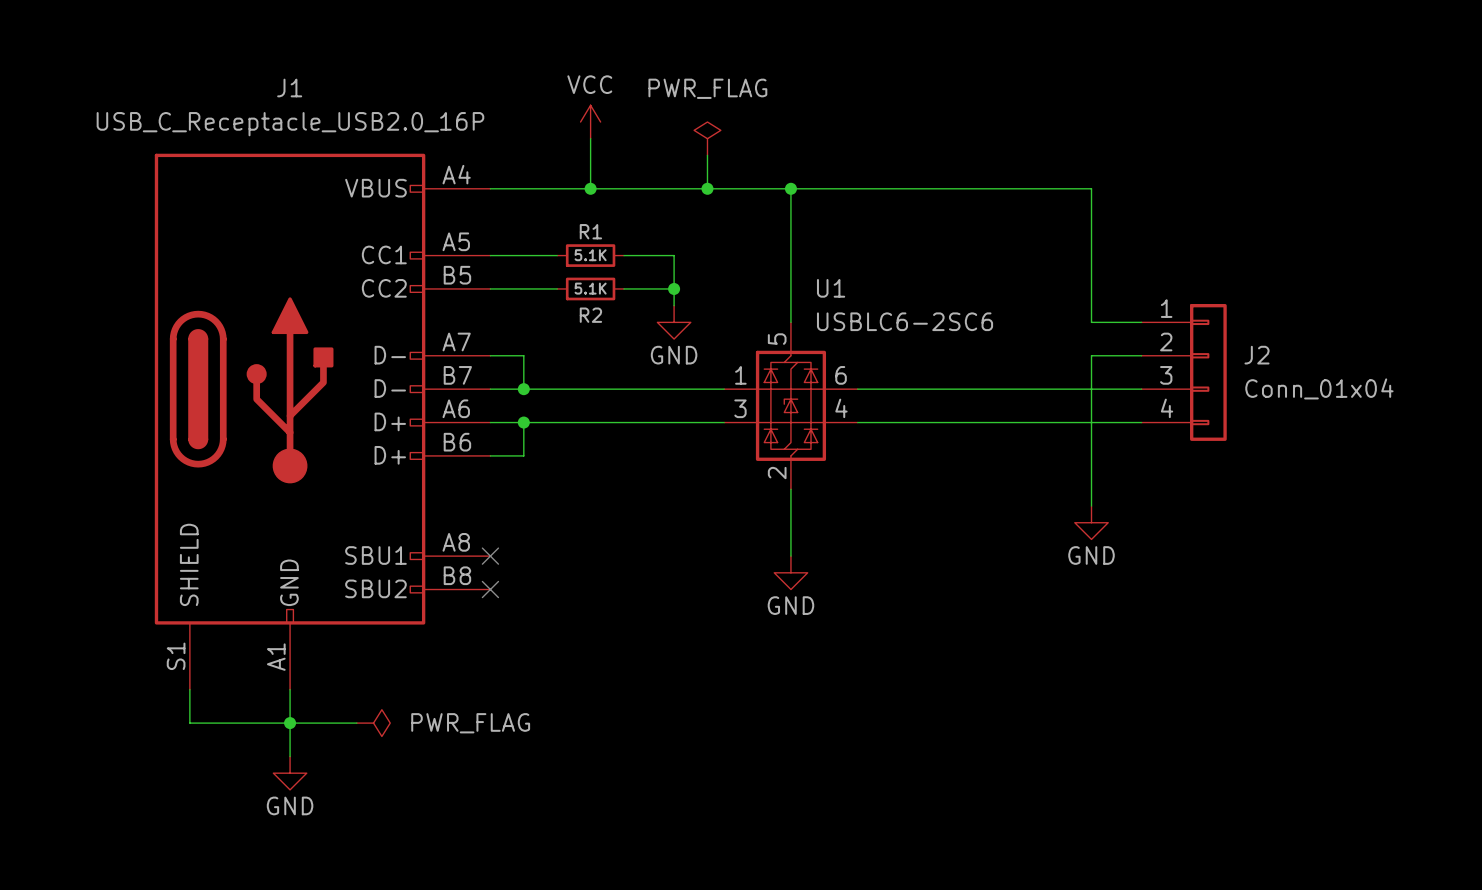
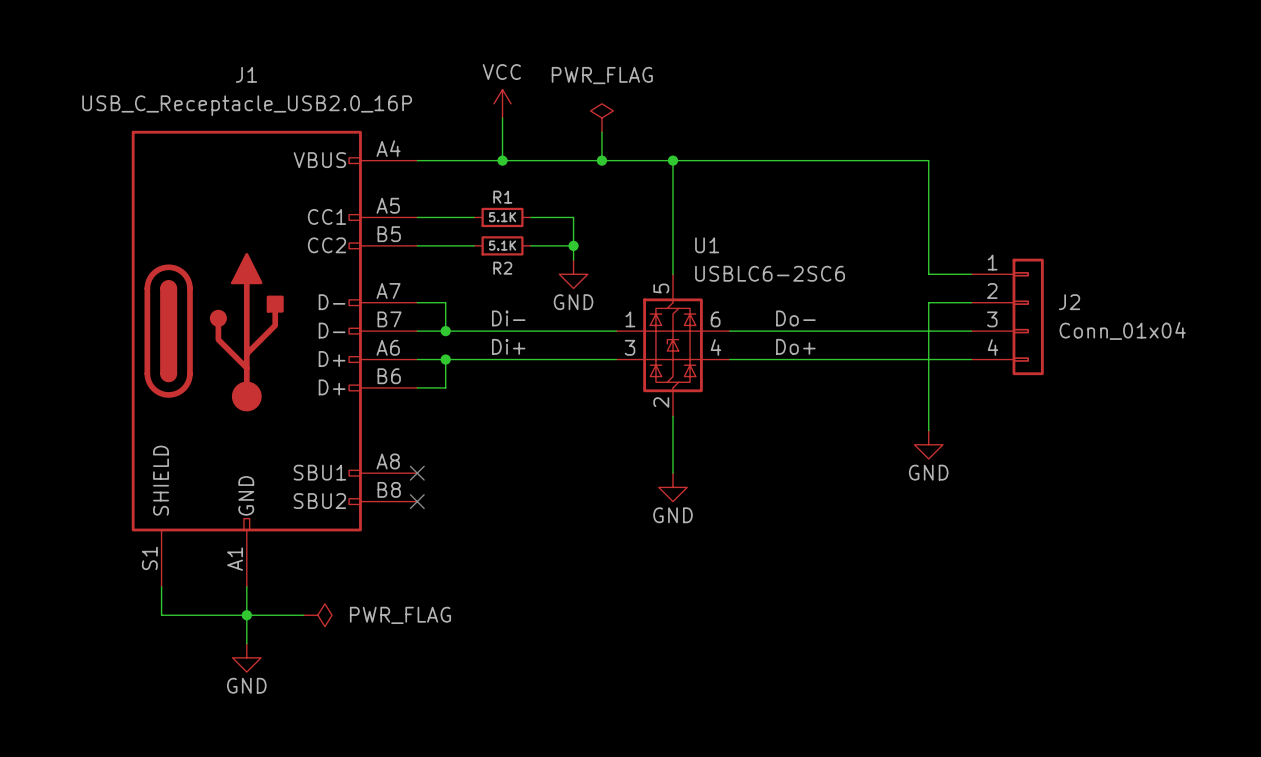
label: none -> Di- (508, 318)
label: none -> Do- (795, 318)
label: none -> Di+ (508, 346)
label: none -> Do+ (795, 346)

